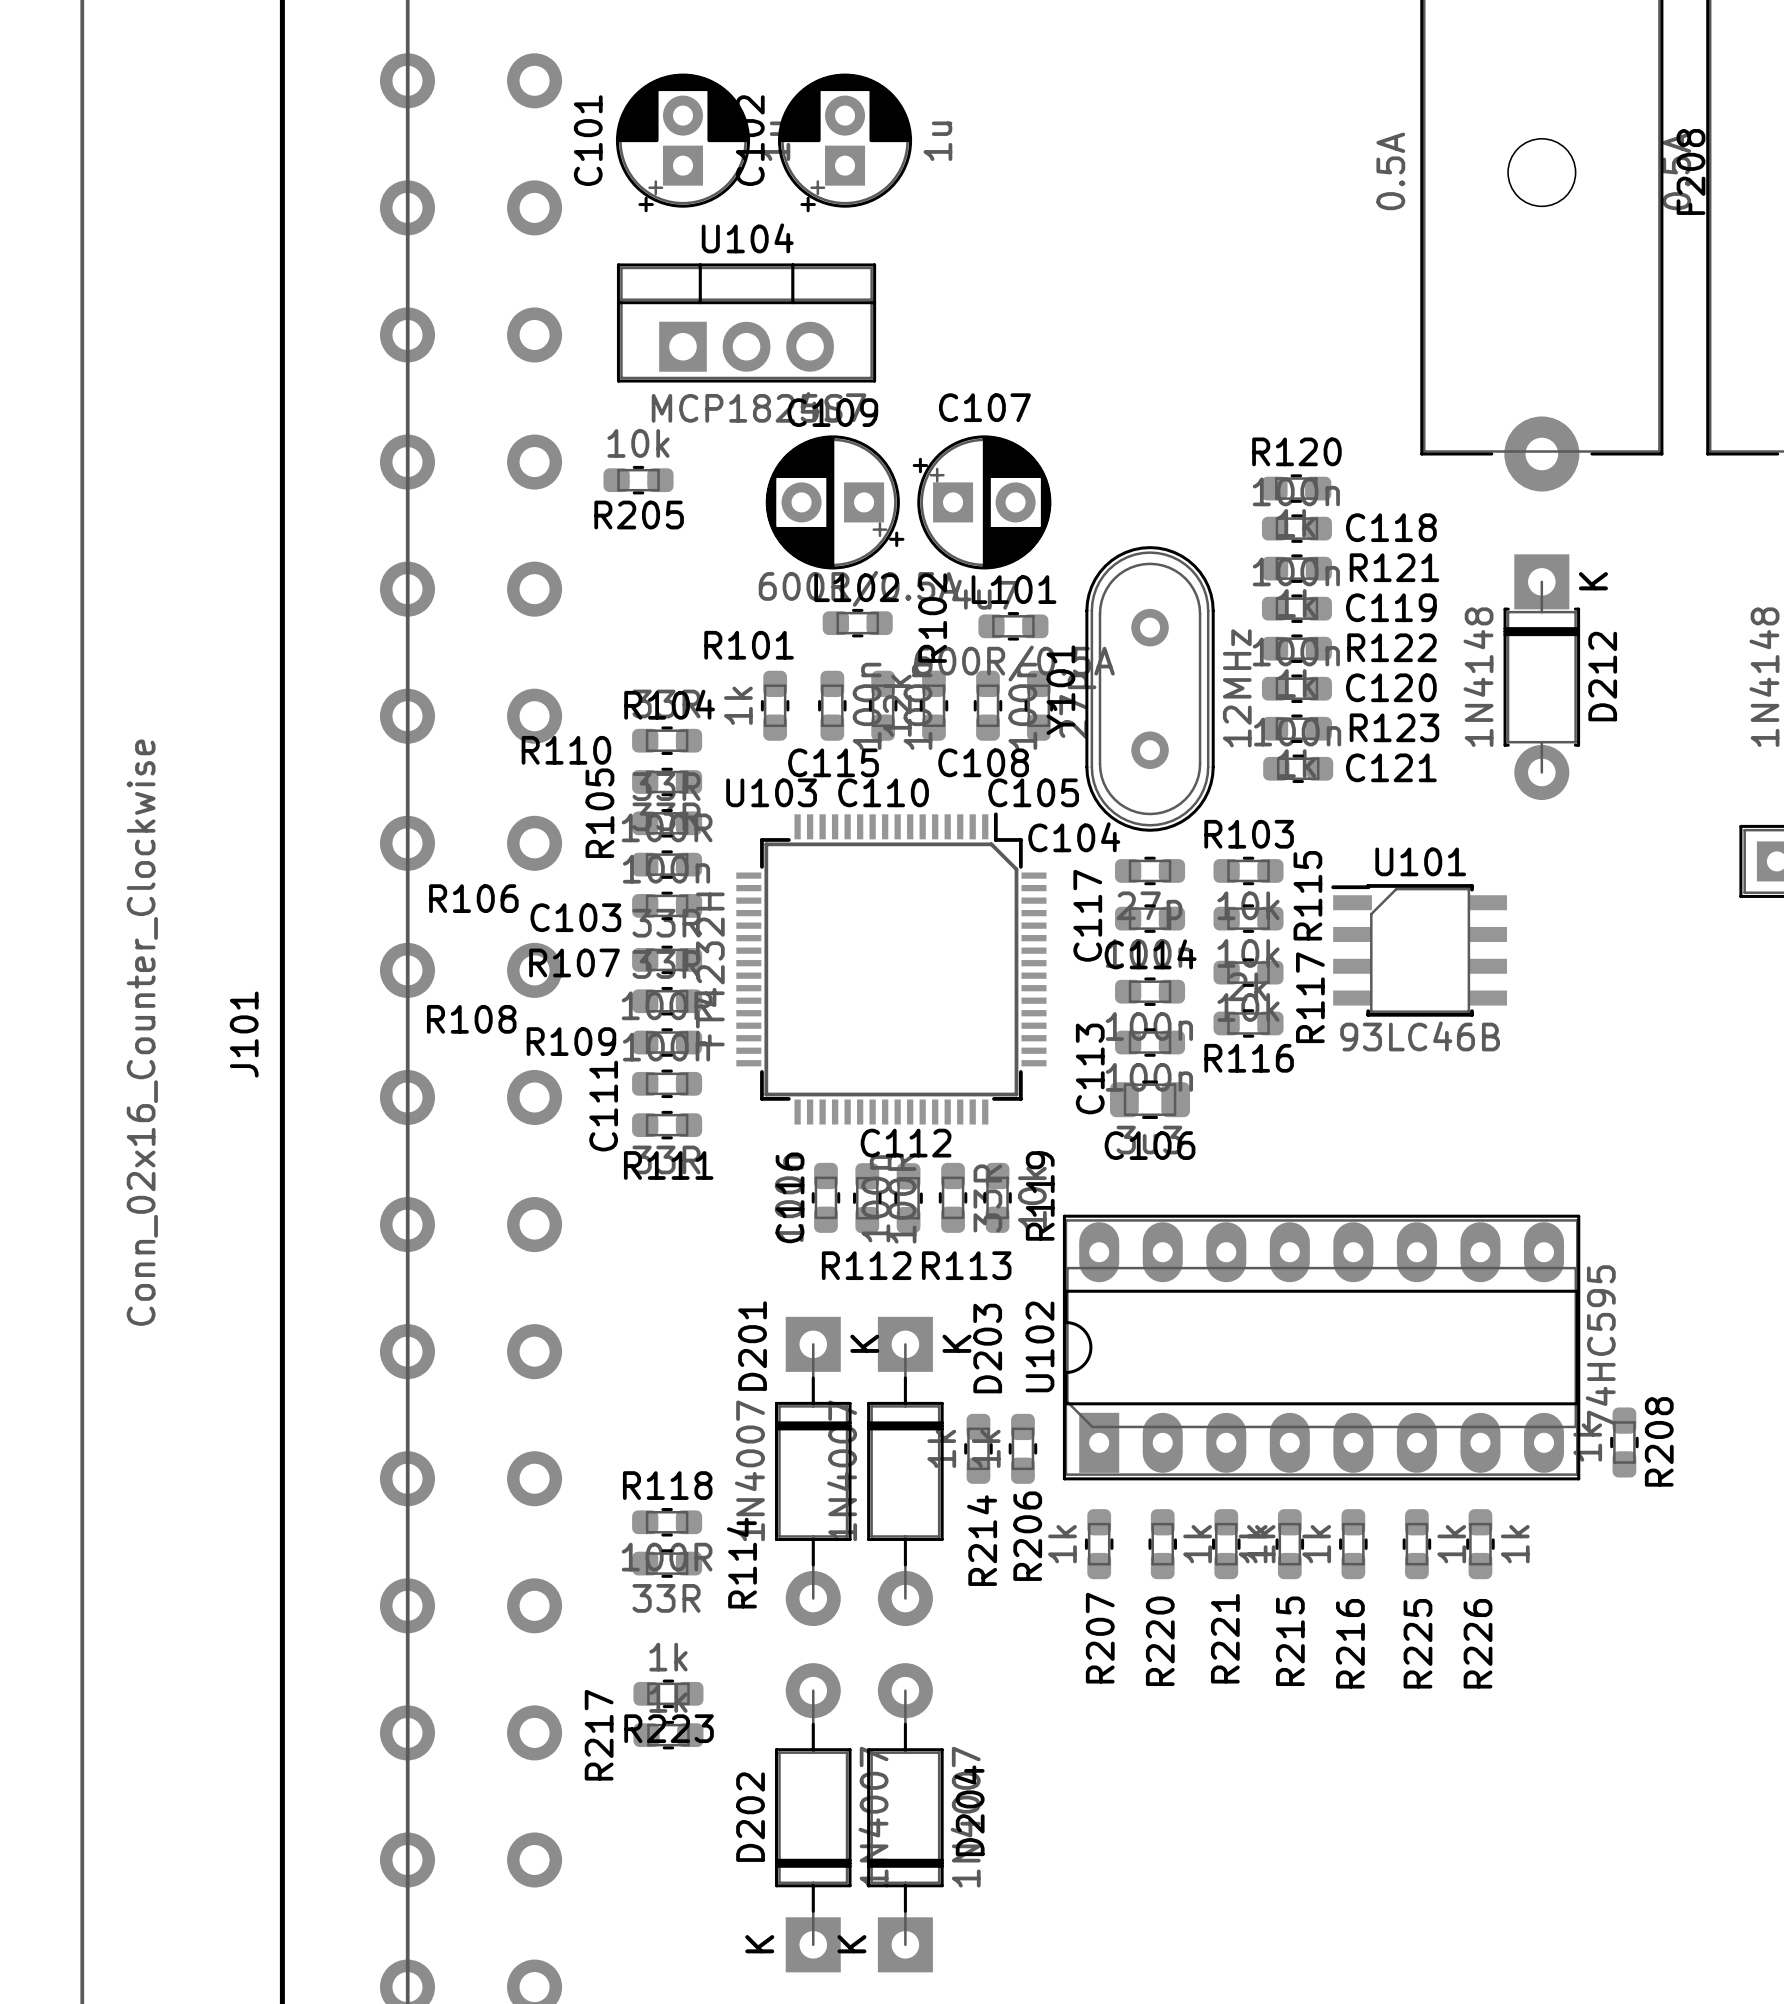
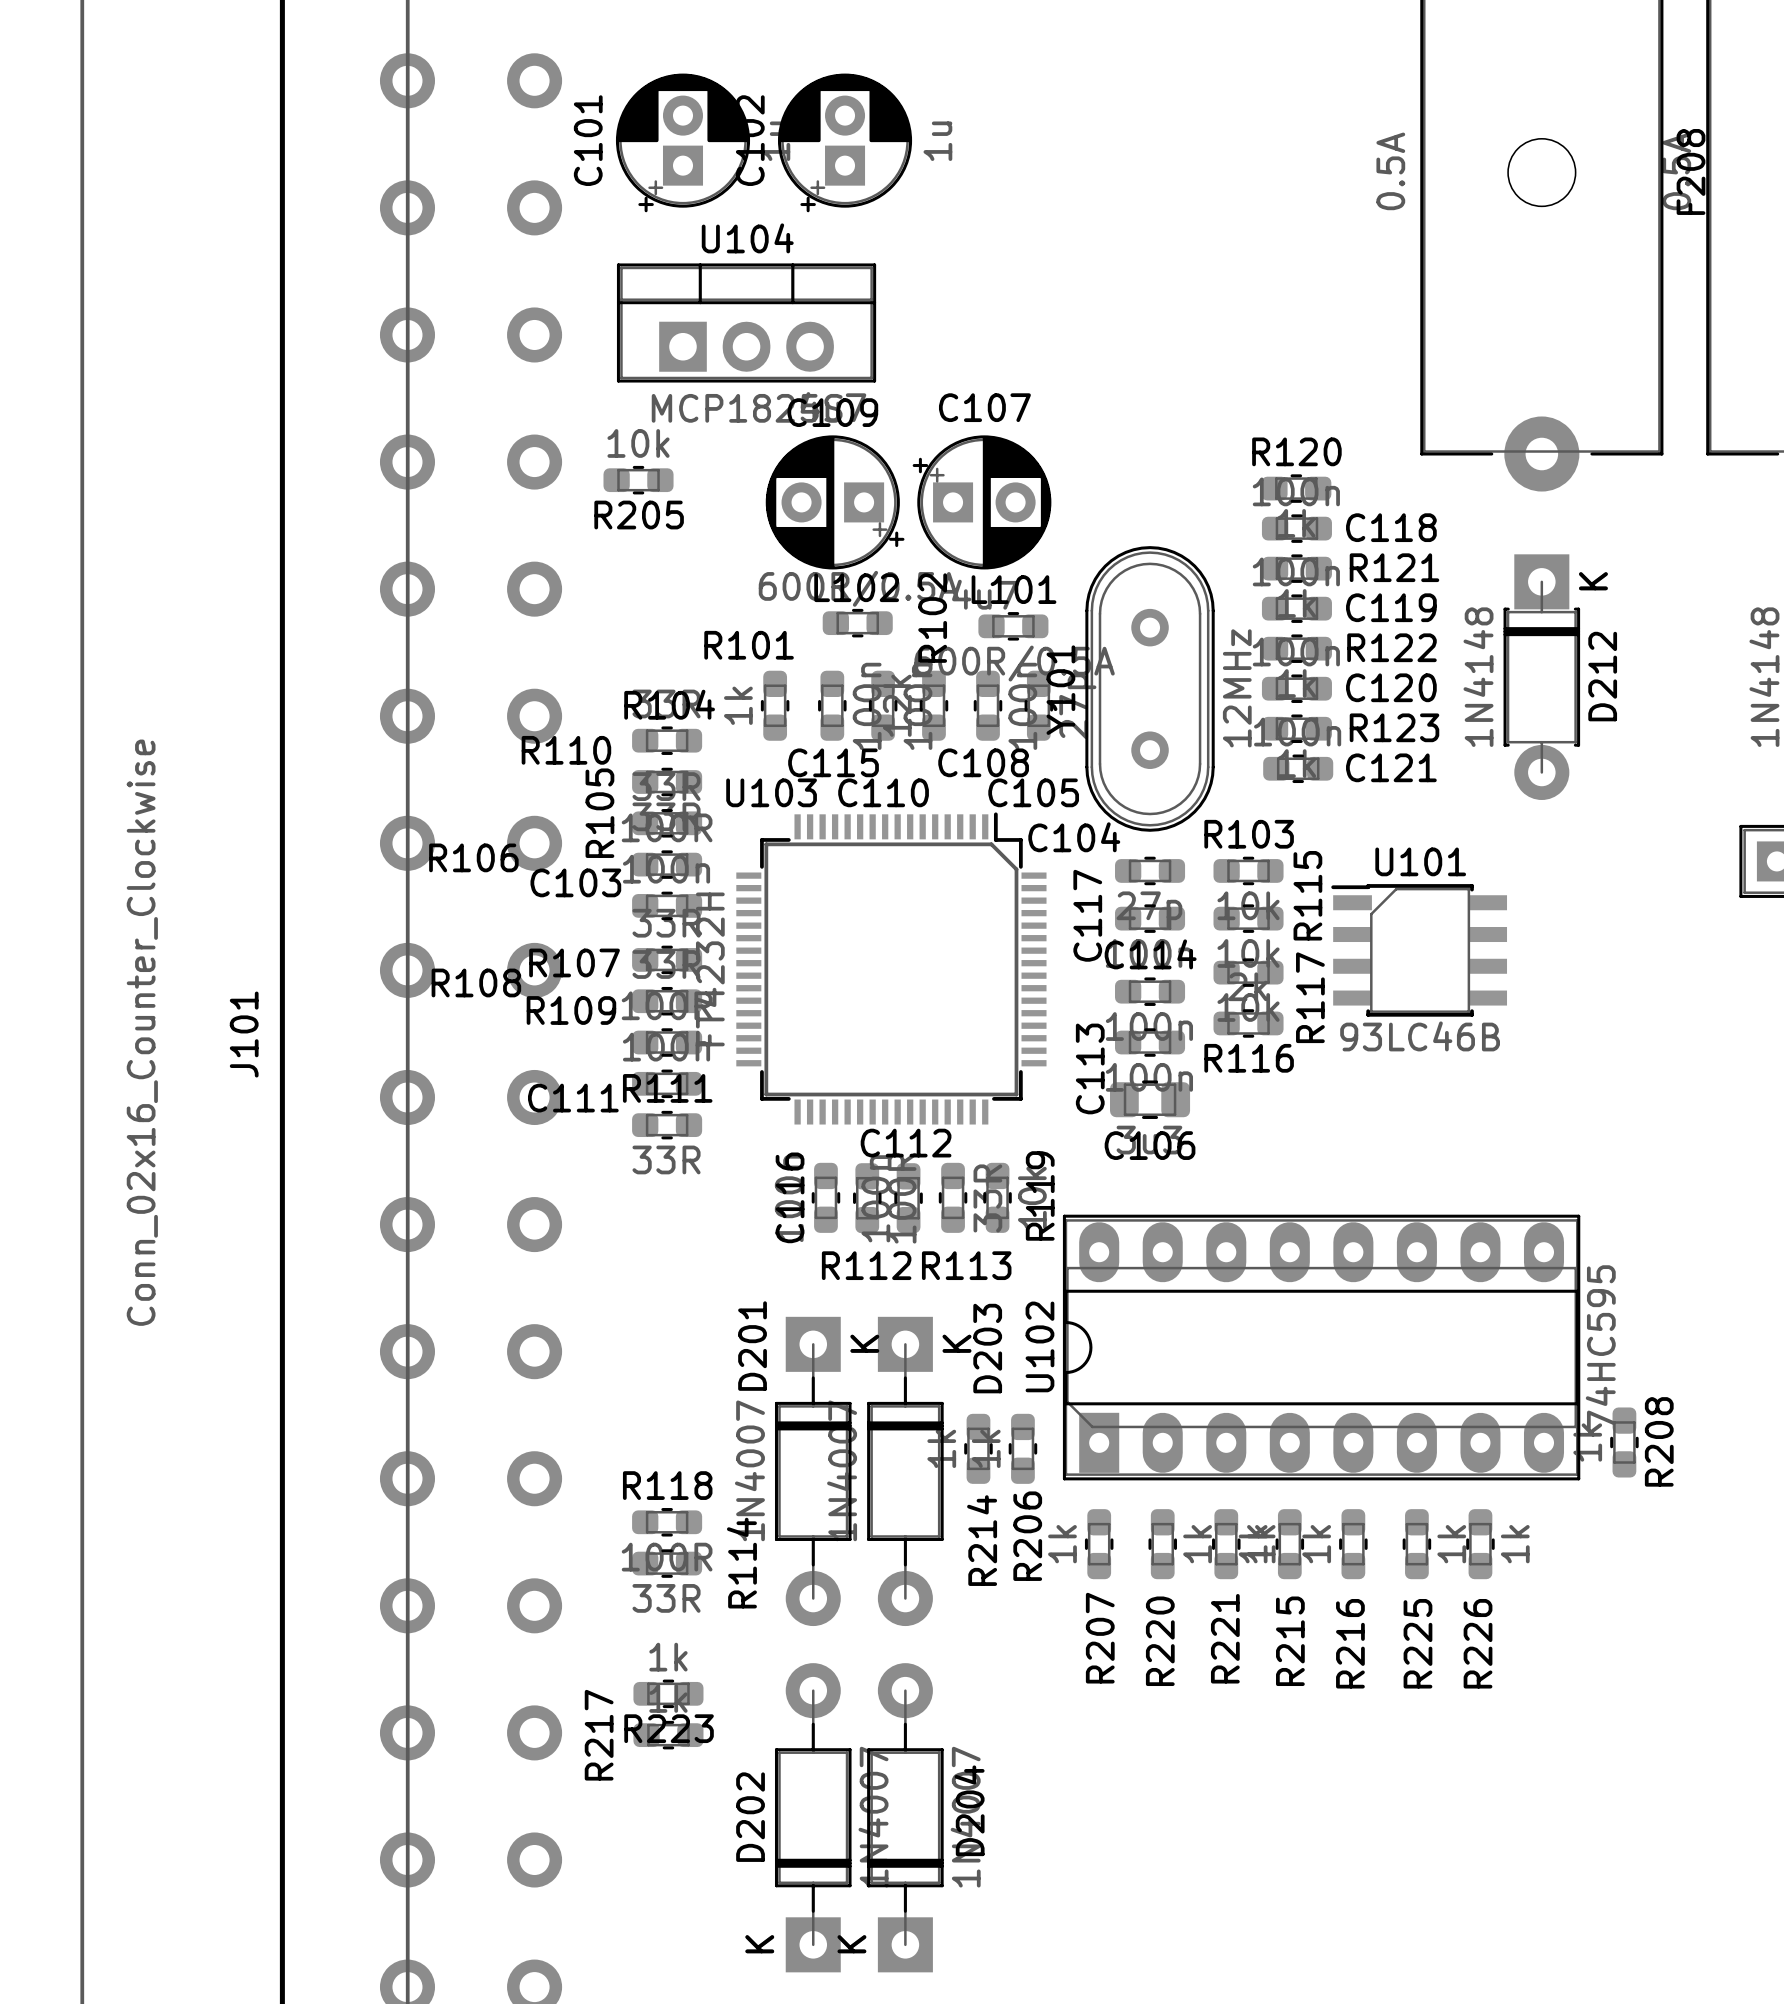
R106 name position: R106 (473, 898) -> R106 (473, 857)
C103 name position: C103 (575, 917) -> C103 (575, 882)
R108 name position: R108 (471, 1019) -> R108 (476, 982)
R109 name position: R109 (571, 1041) -> R109 (571, 1010)
C111 name rotation: 0° (603, 1106) -> 90° clockwise (573, 1098)
R111 name position: R111 (668, 1165) -> R111 (667, 1088)

